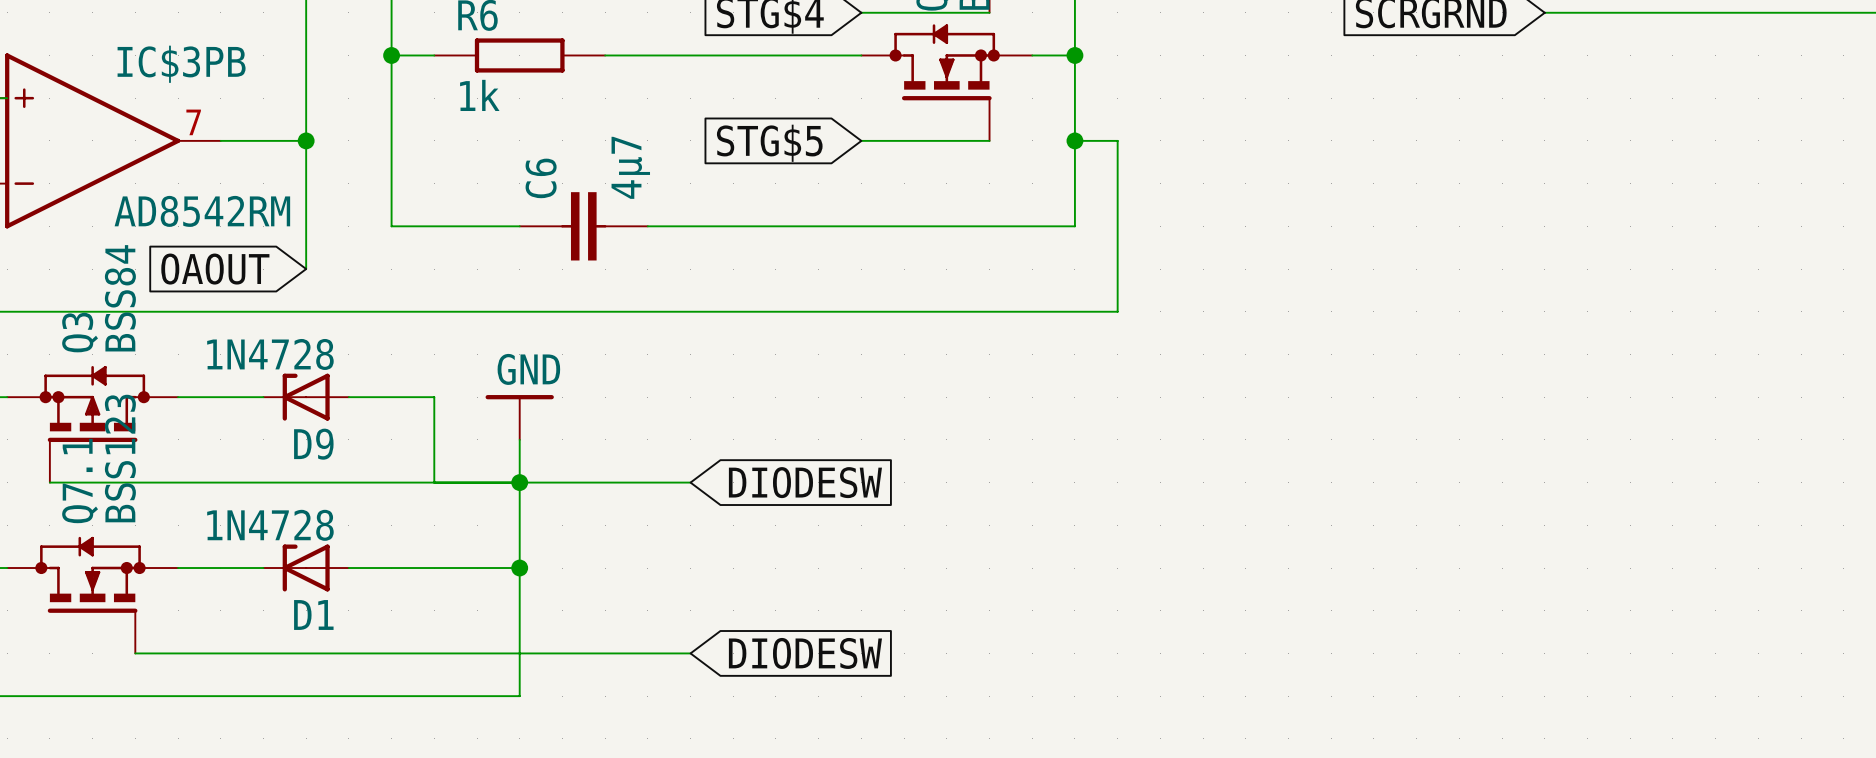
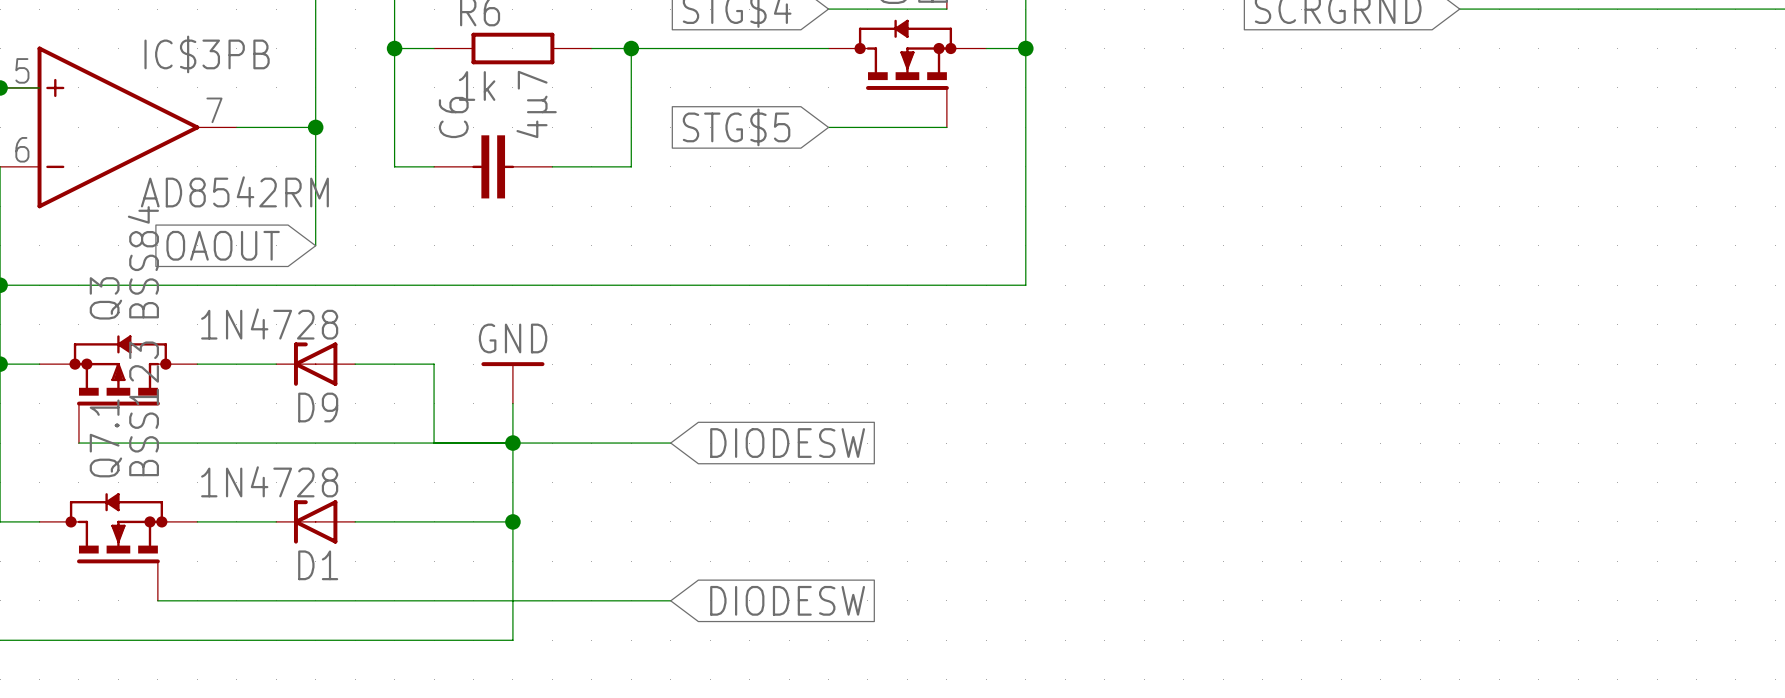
wire: none -> (631, 48) (631, 166) (552, 166)
junction: none -> (631, 48)
wire: (1074, 140) (1117, 140) (1117, 311) (1074, 311) -> (1025, 206) (1025, 285)
junction: (1074, 140) -> none
wire: (391, 183) (391, 226) (519, 226) -> (394, 166) (434, 166)
C6 position: (583, 226) -> (493, 166)
wire: (647, 226) (1074, 226) -> none

